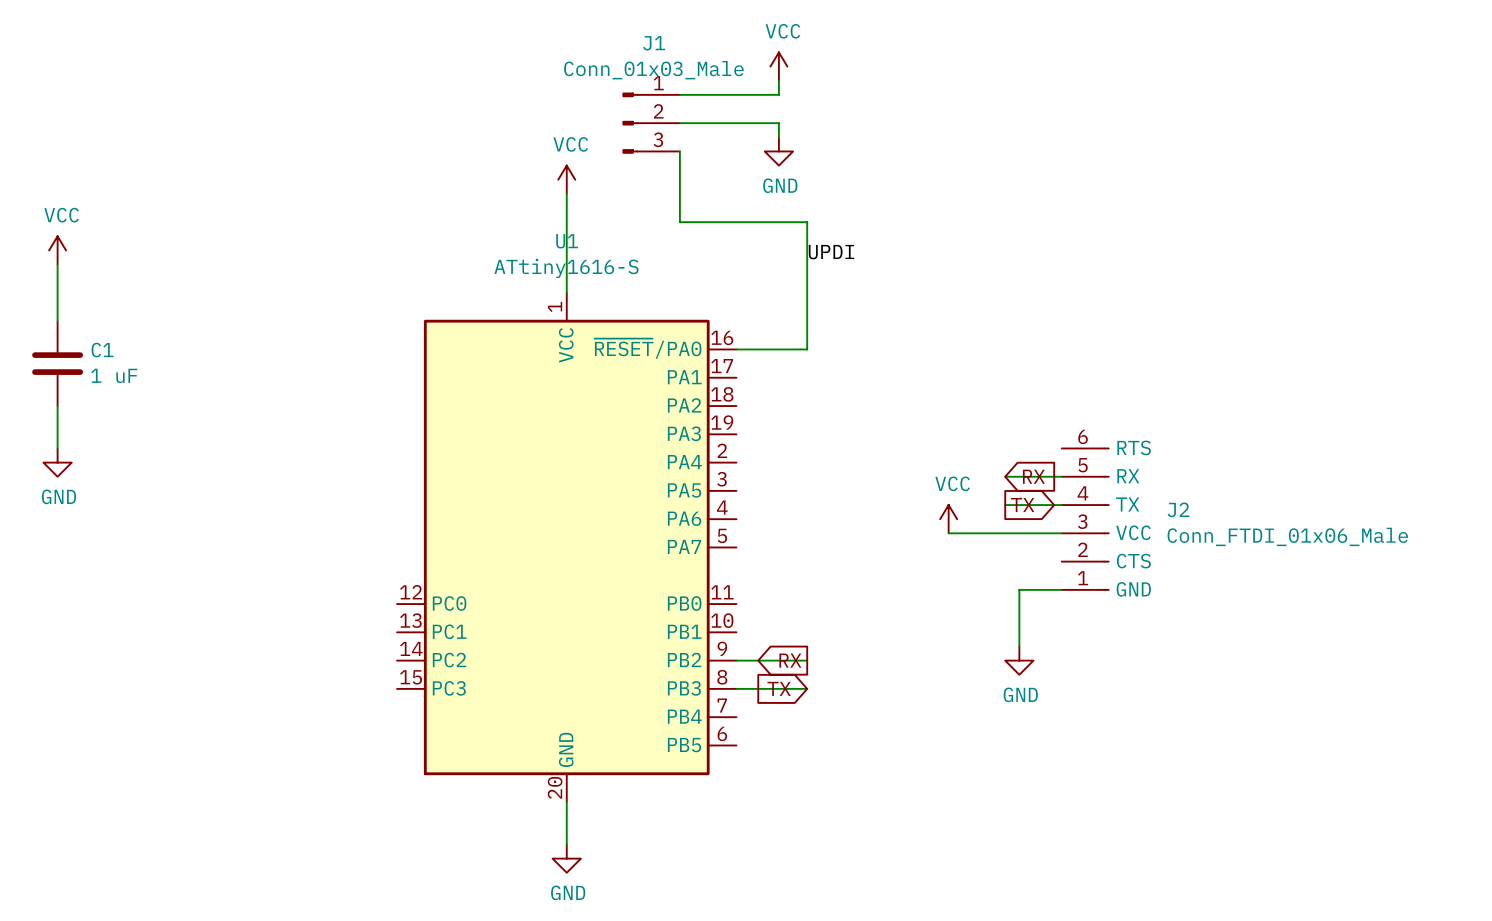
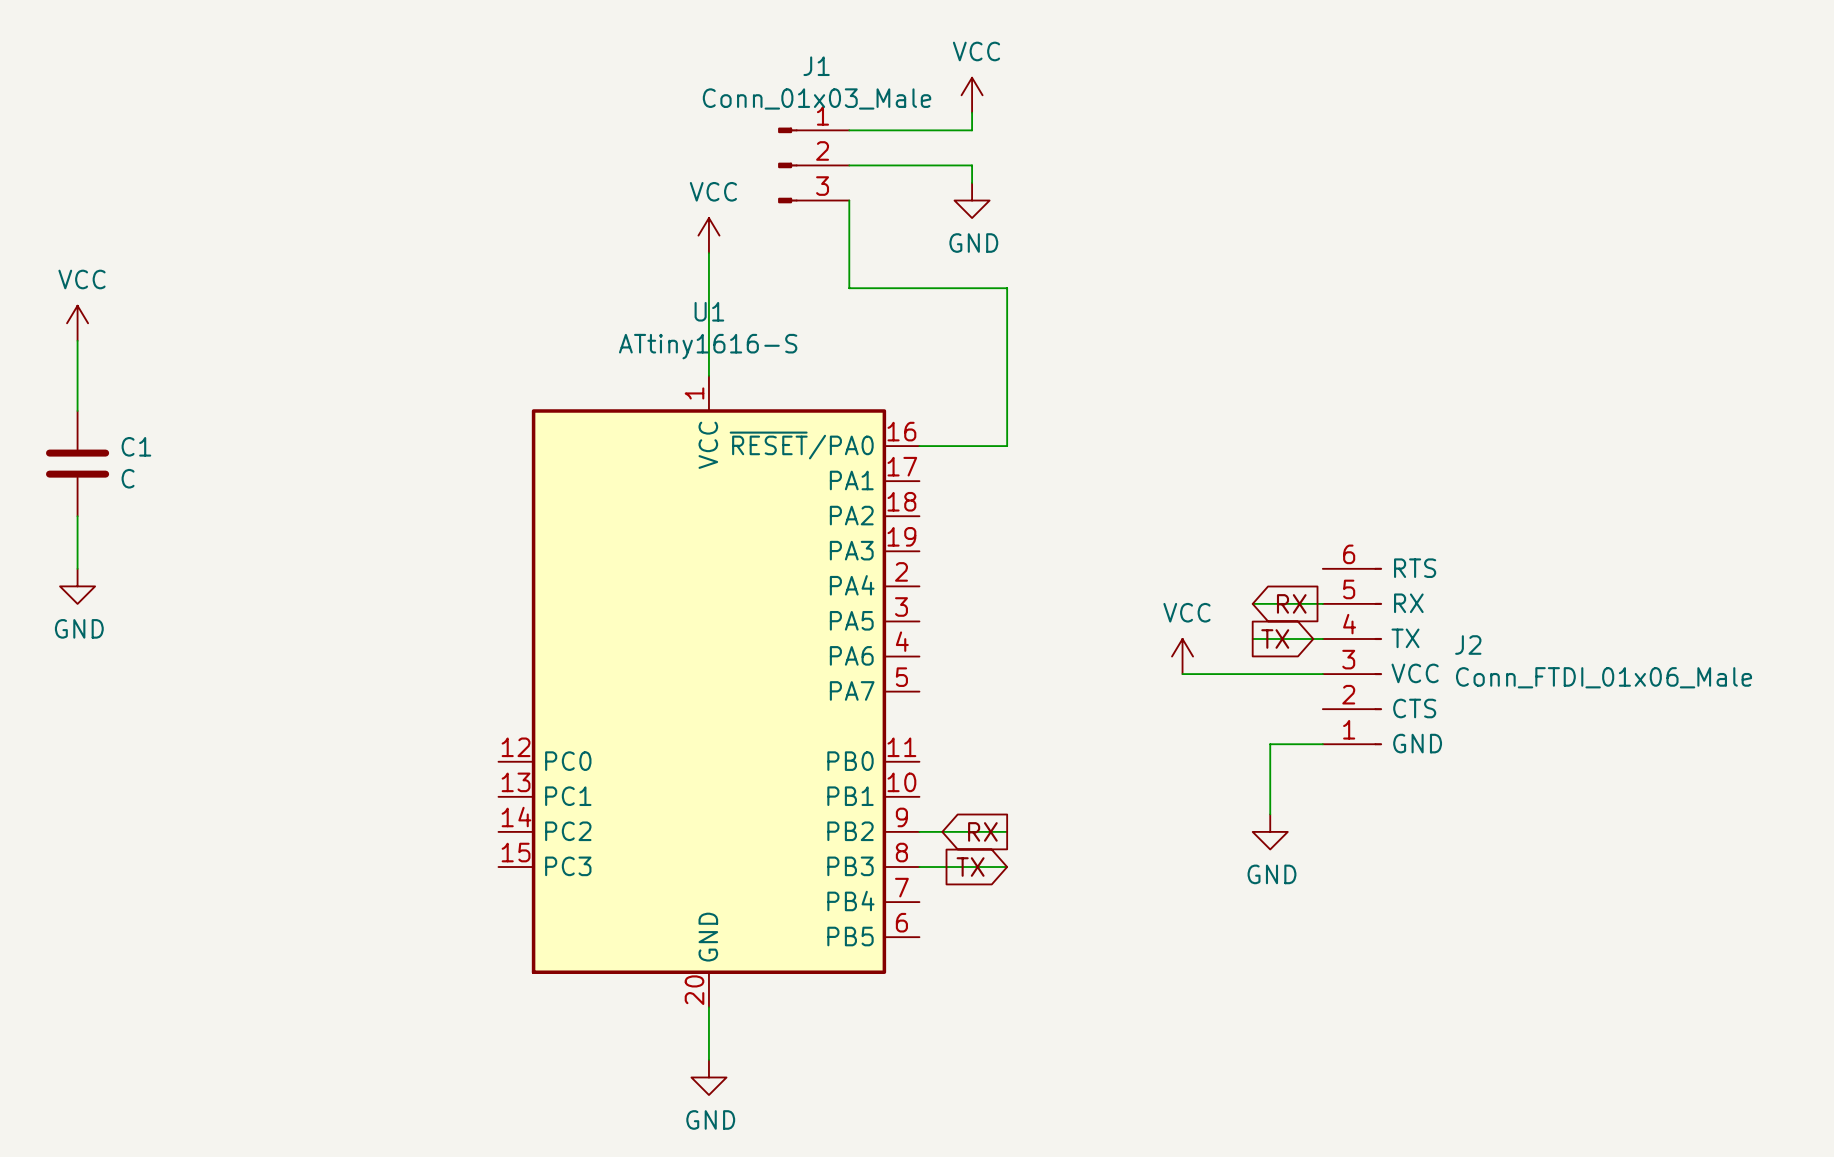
label: UPDI (831, 252) -> none
C1 value: 1 uF (114, 375) -> C (128, 478)

